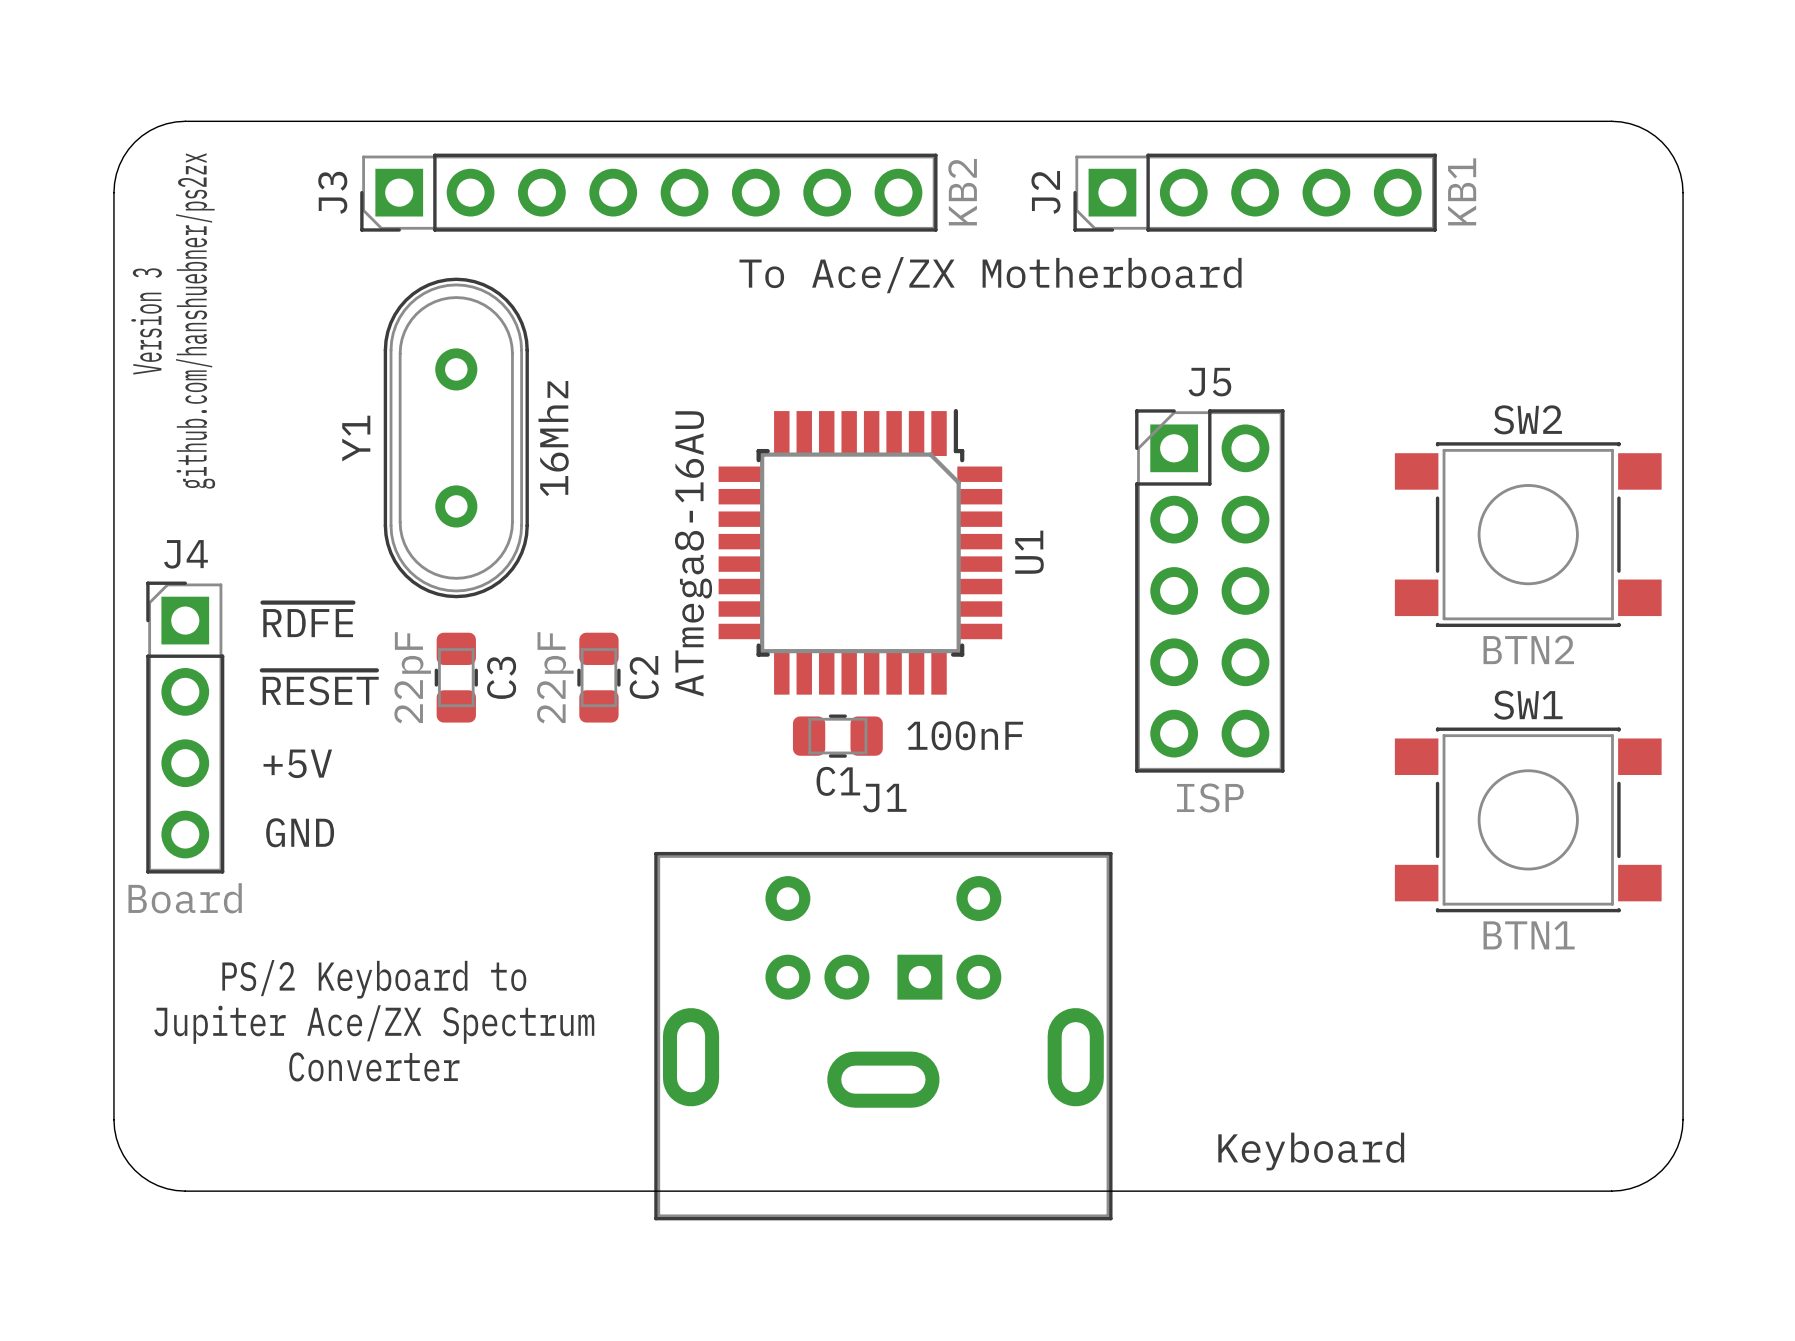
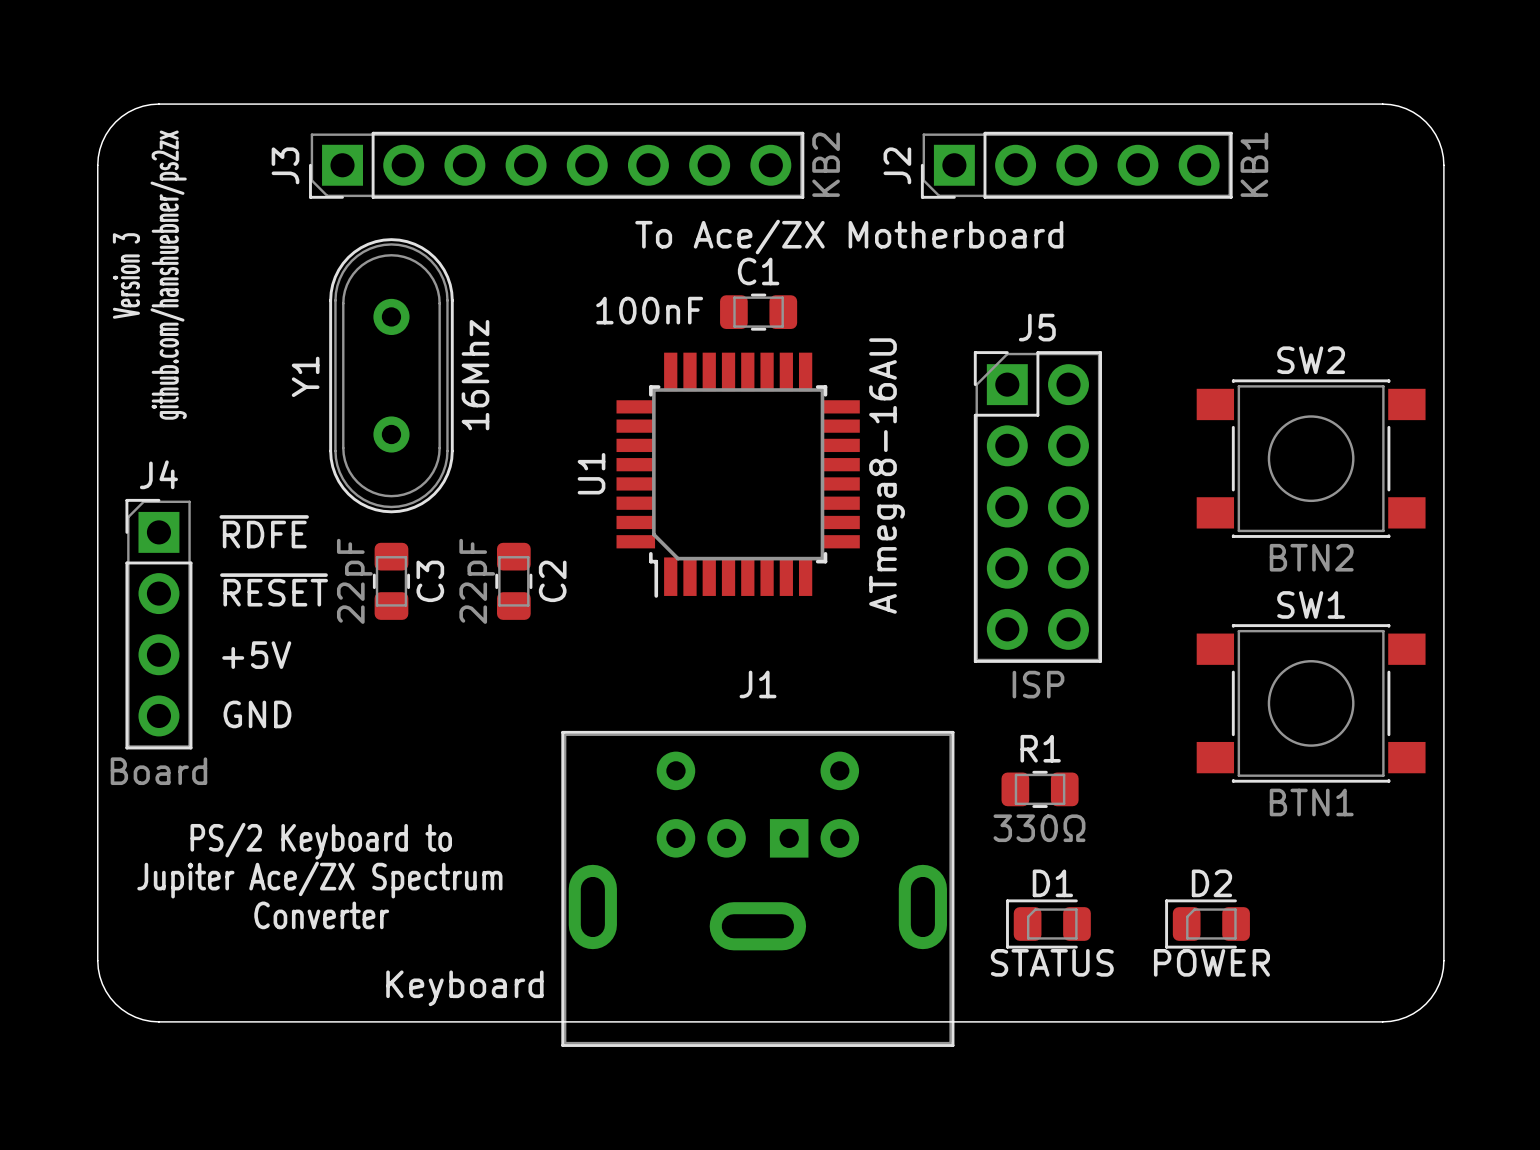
U1 rotation: 0° (860, 551) -> 180° (738, 475)
C1 value position: 100nF (965, 735) -> 100nF (649, 310)
C1 position: (837, 736) -> (758, 312)
C1 name position: C1 (838, 781) -> C1 (758, 271)
R1: none -> 330Ω (1040, 789)
D1: none -> STATUS (1048, 924)
D2: none -> POWER (1207, 924)
J1 value position: Keyboard (1311, 1151) -> Keyboard (464, 988)

